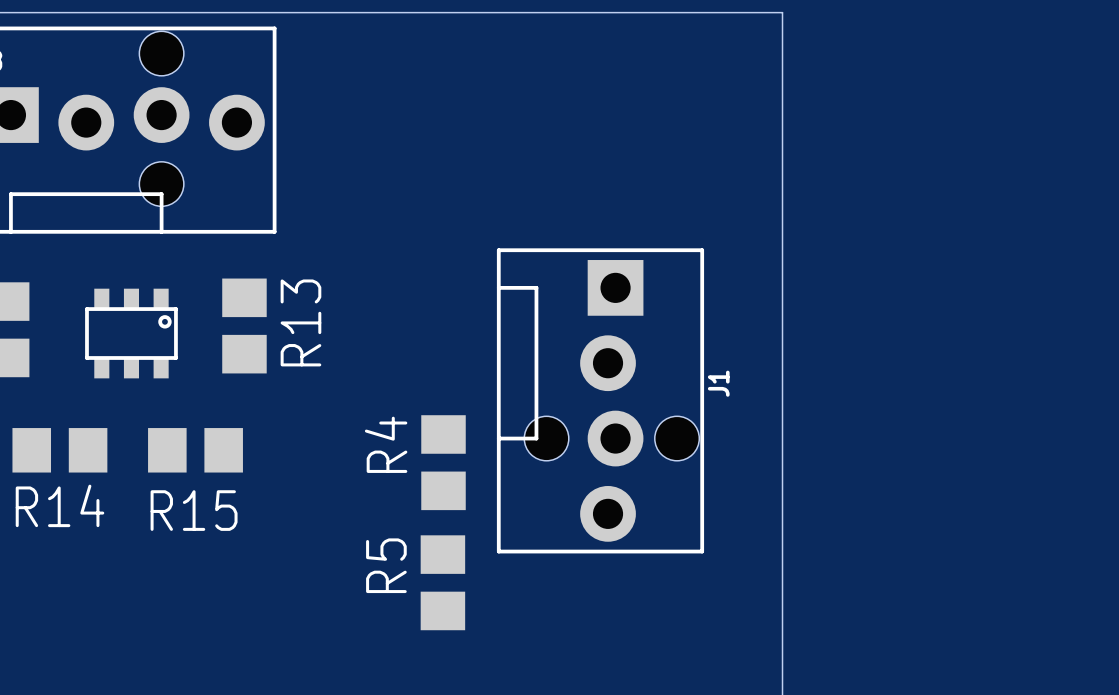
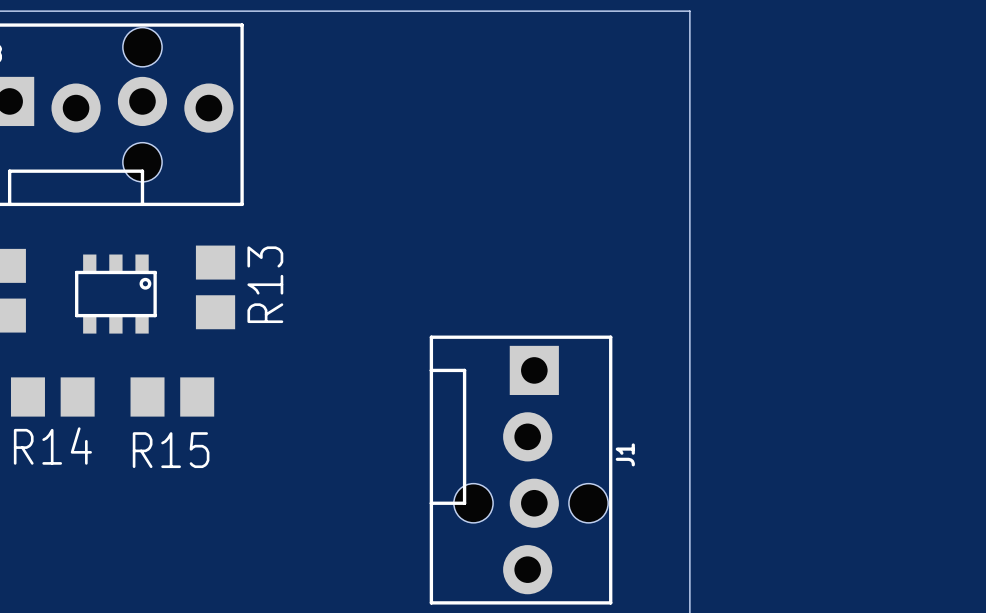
J1 position: (600, 400) -> (521, 470)
R4: (443, 462) -> none
R5: (442, 582) -> none

